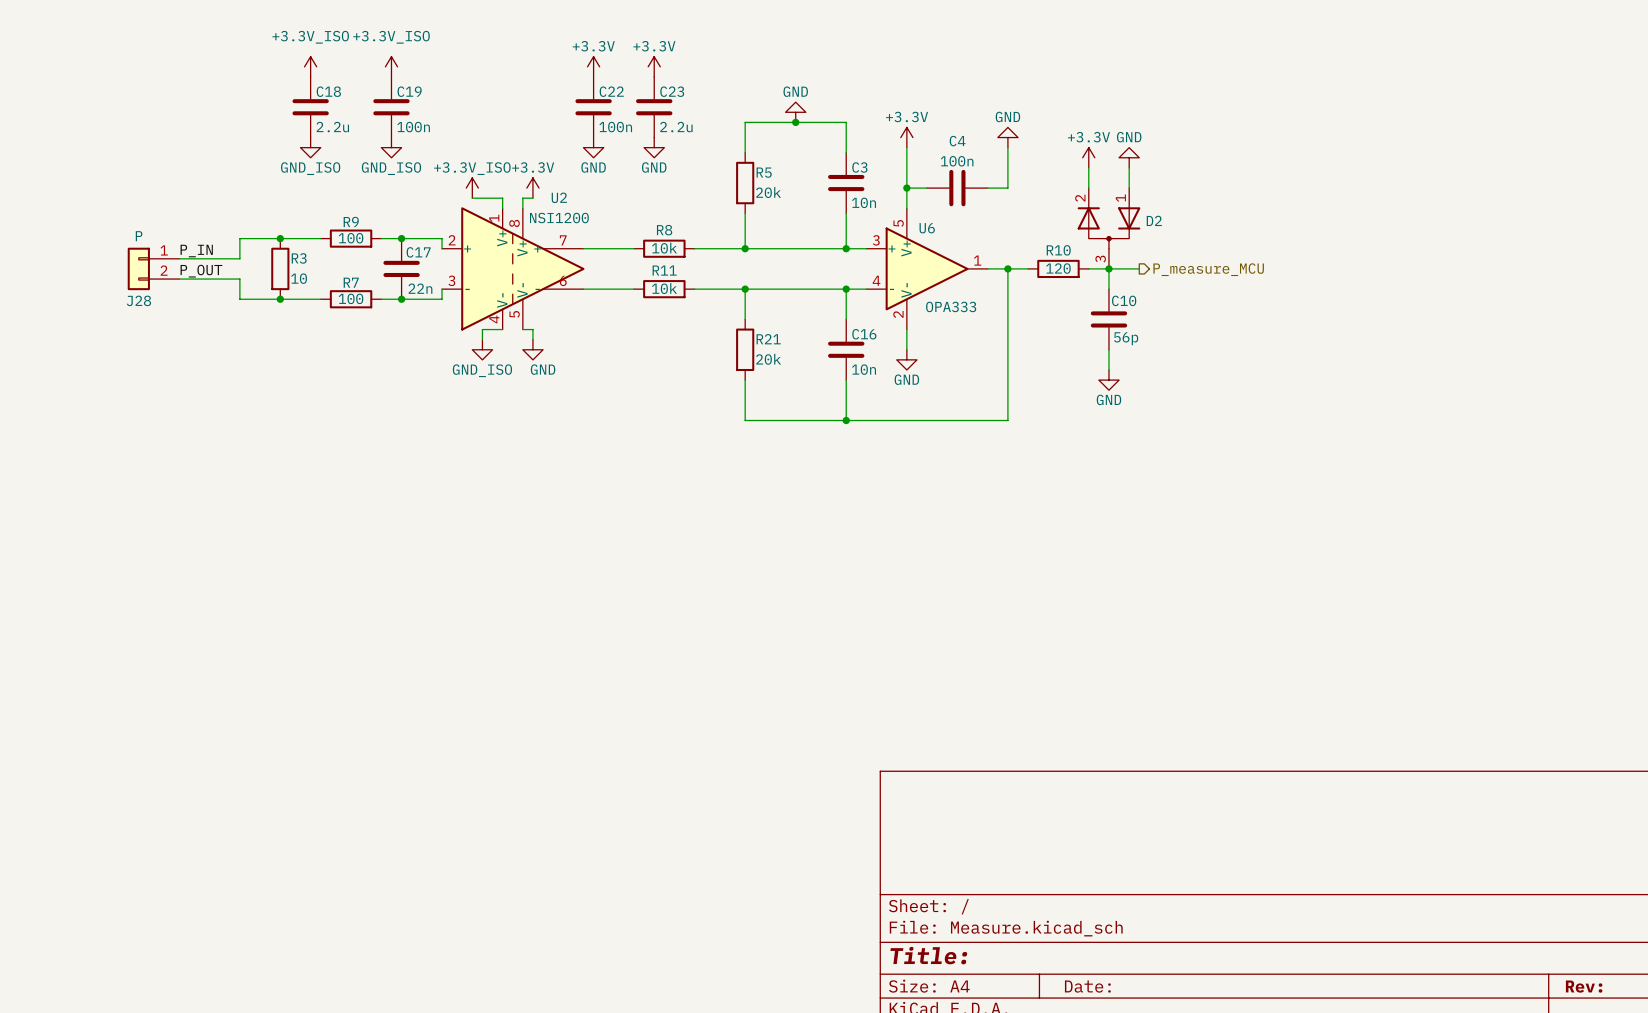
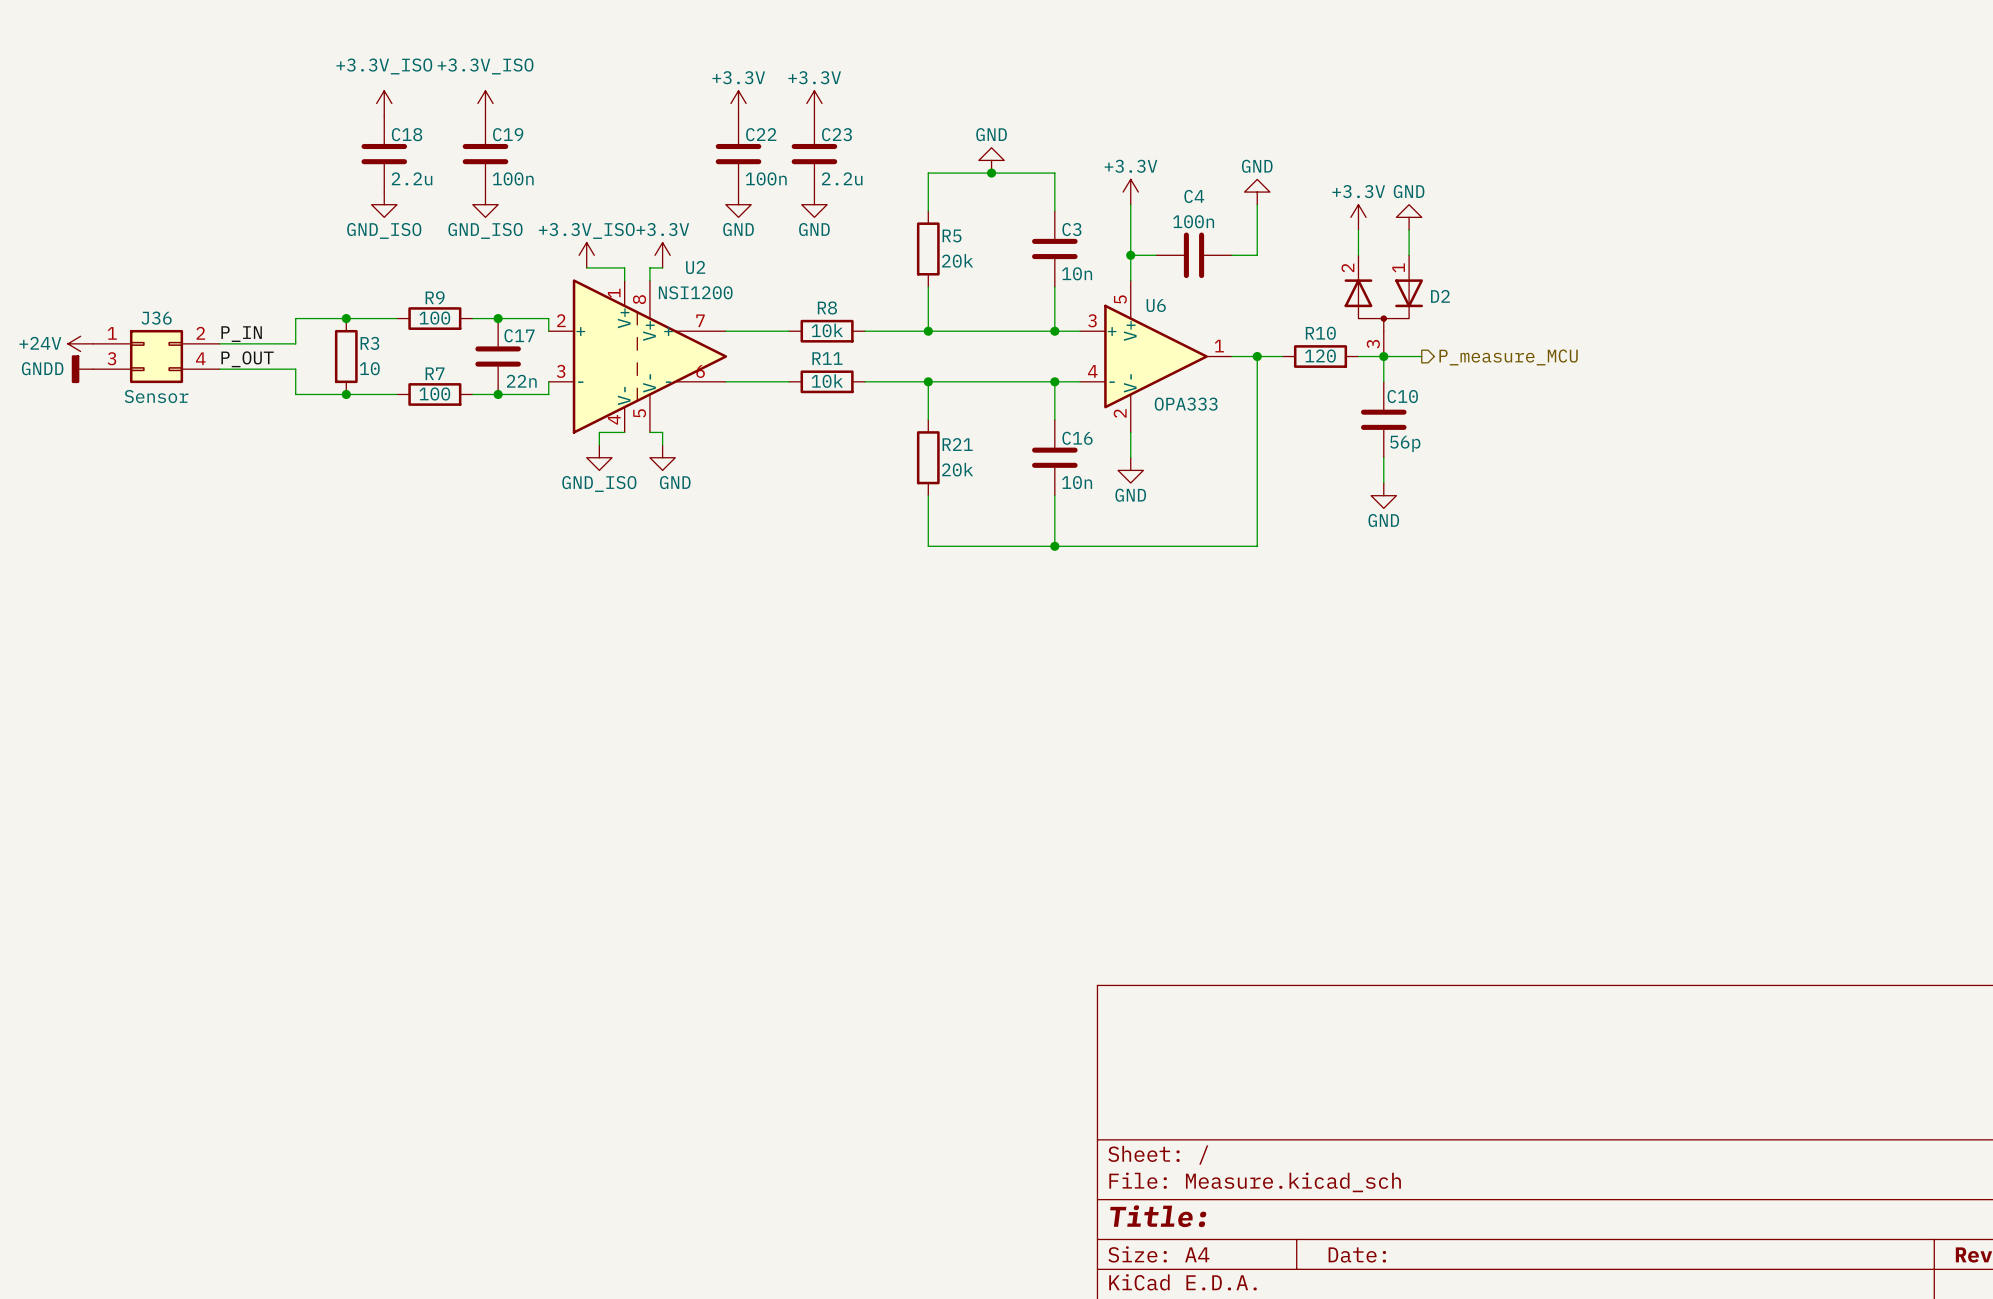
power symbol: none -> +24V (80, 343)
J36: none -> (156, 356)
J28: (153, 268) -> none
power symbol: none -> GNDD (82, 369)

